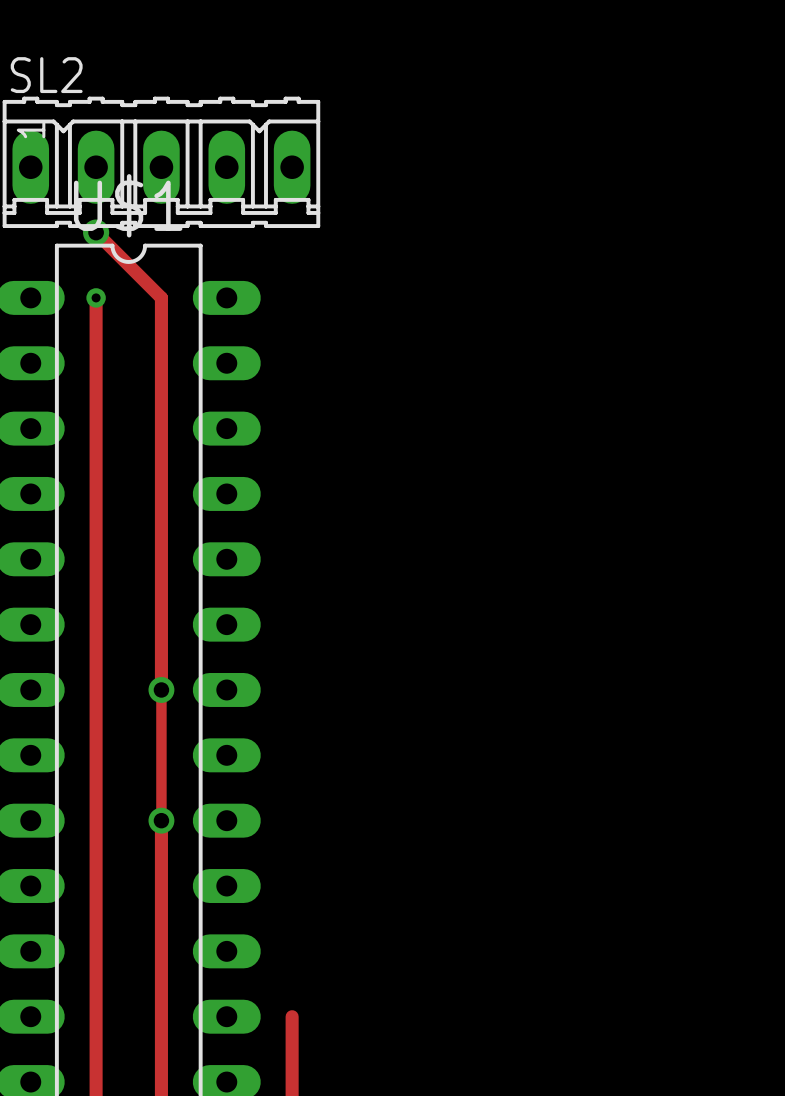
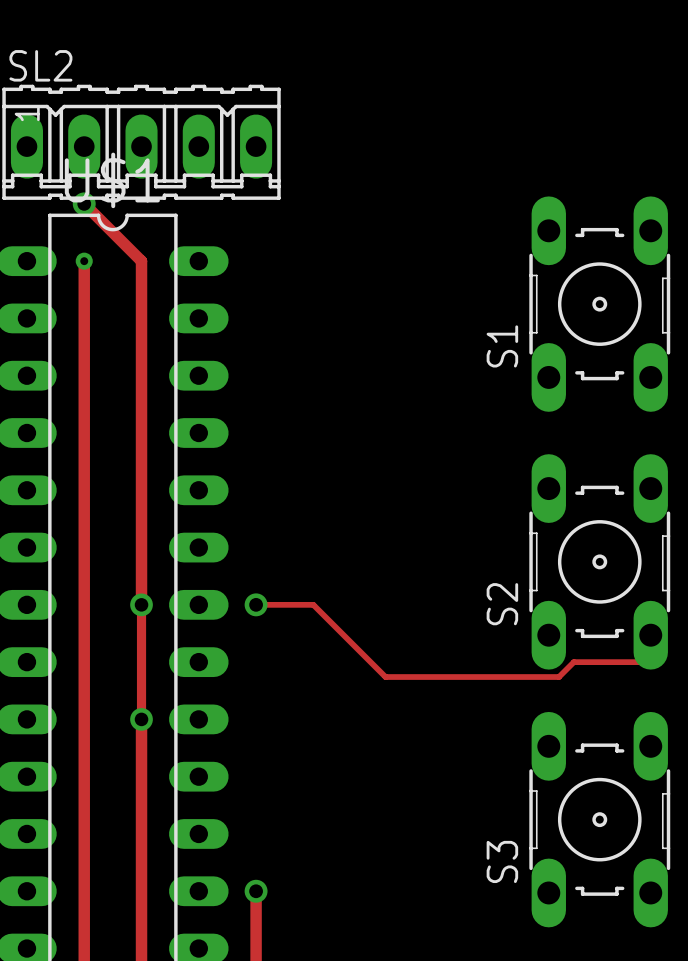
S1: none -> (599, 304)
S2: none -> (599, 561)
track: none -> (256, 604) (313, 604) (385, 677) (558, 677) (573, 662) (657, 662) (657, 641) (650, 635)
via: none -> (256, 604)
S3: none -> (599, 819)
via: none -> (256, 891)

